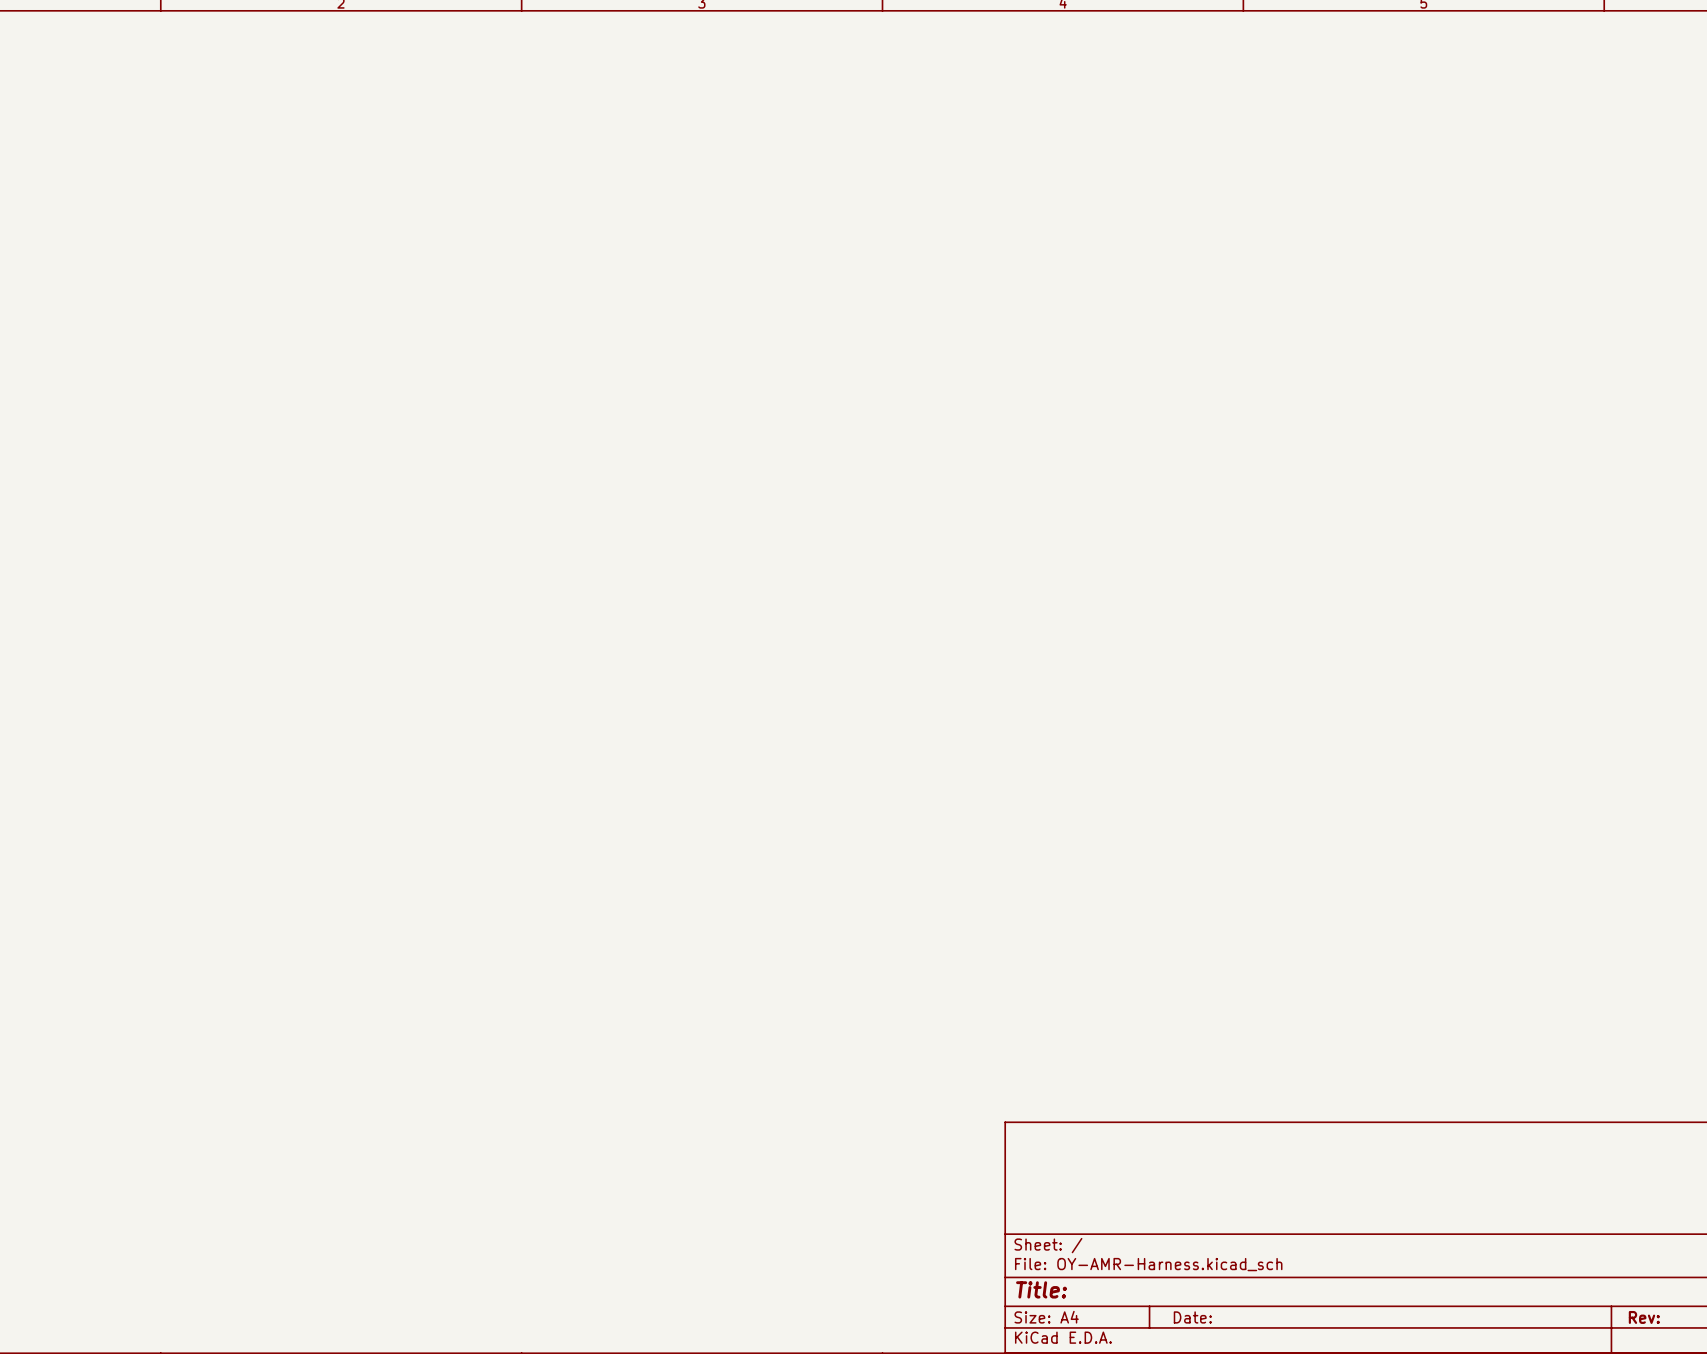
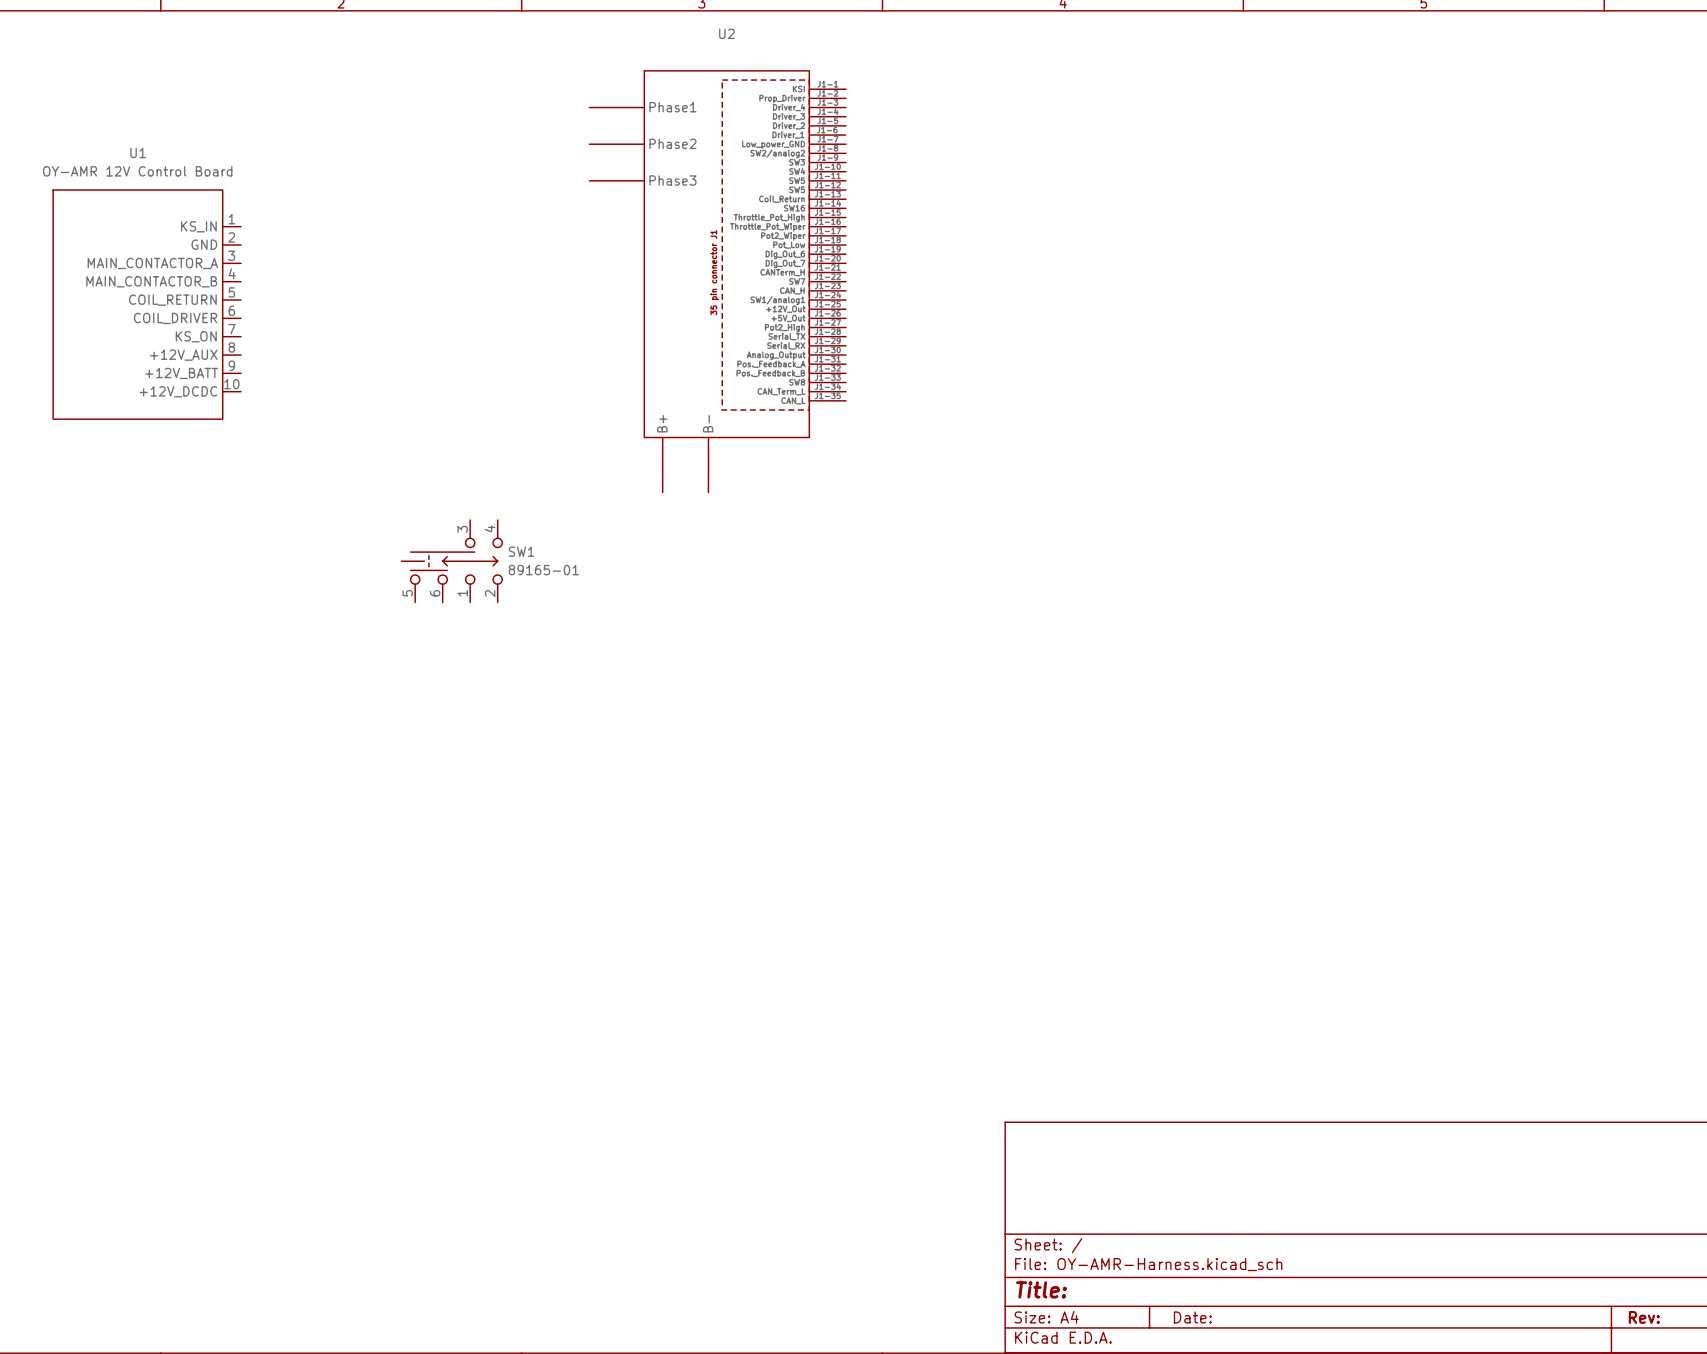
U2: none -> (717, 281)
U1: none -> OY-AMR 12V Control Board (147, 304)
SW1: none -> 89165-01 (451, 561)

